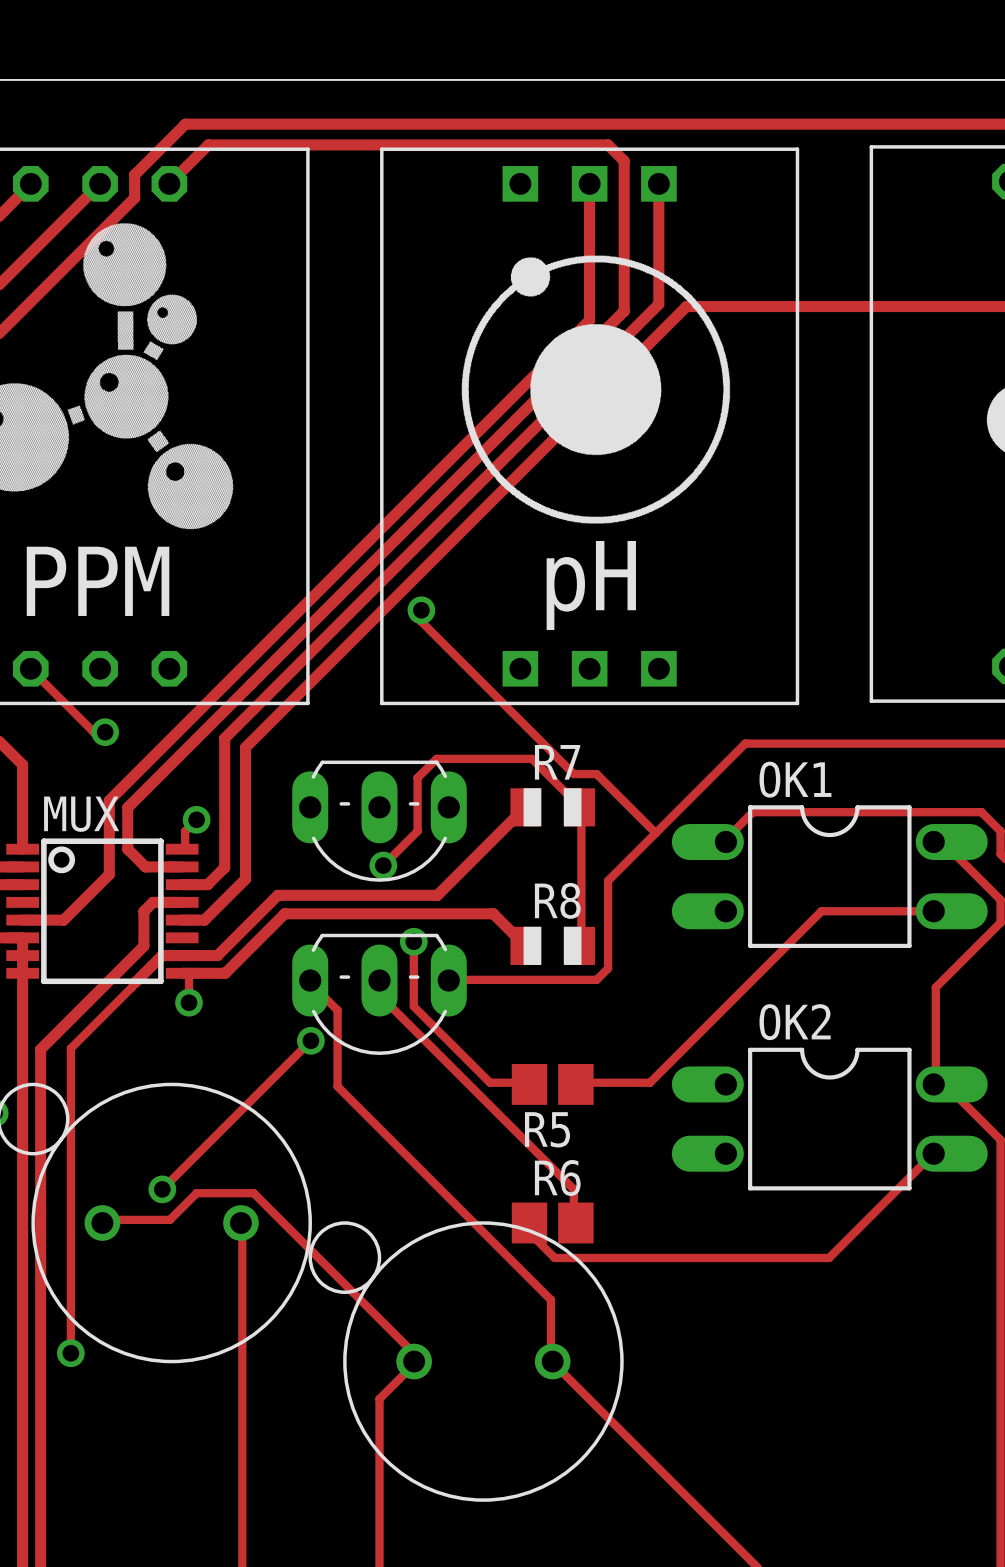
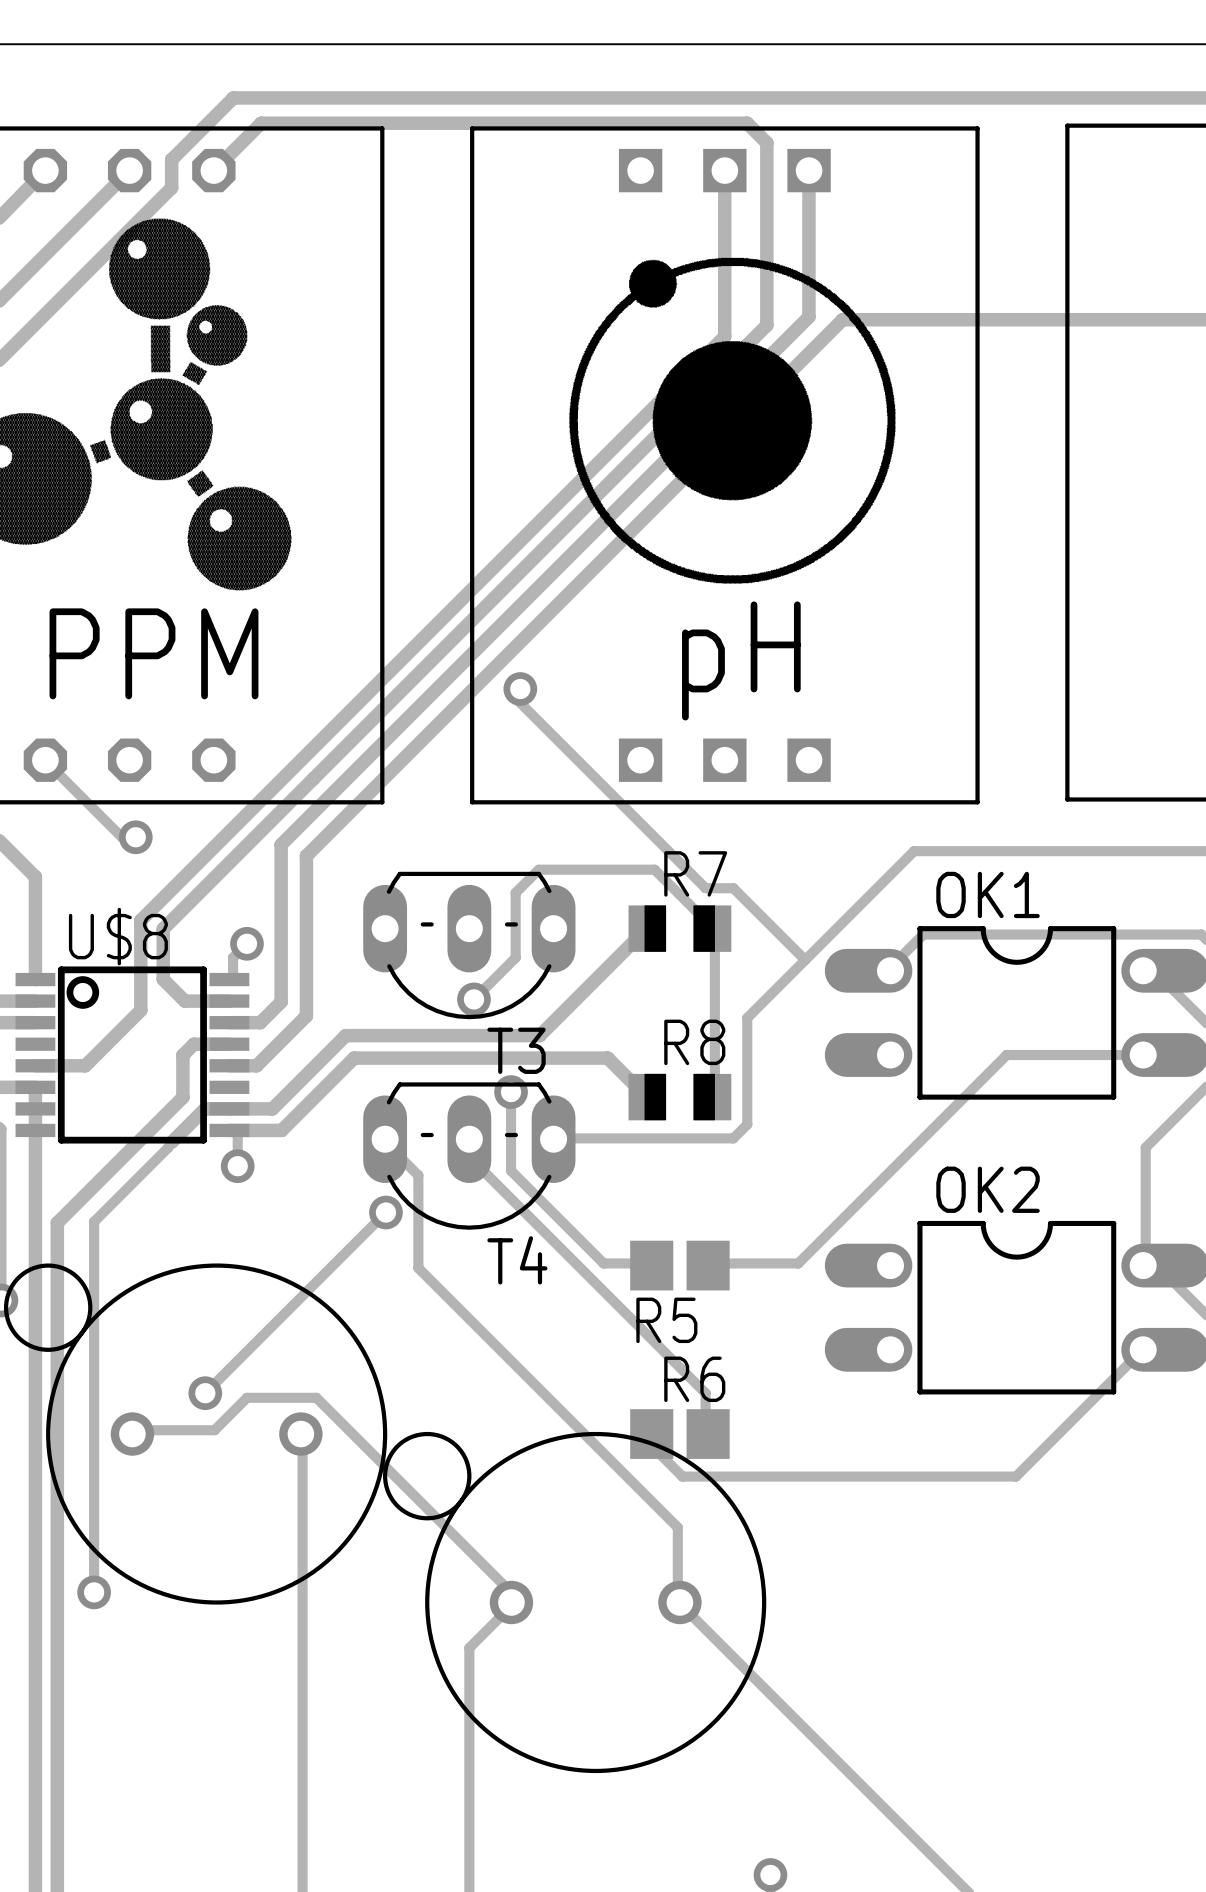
MUX name: MUX (81, 814) -> U$8 (118, 936)
T3 name: none -> T3 (516, 1050)
T4 name: none -> T4 (517, 1260)

